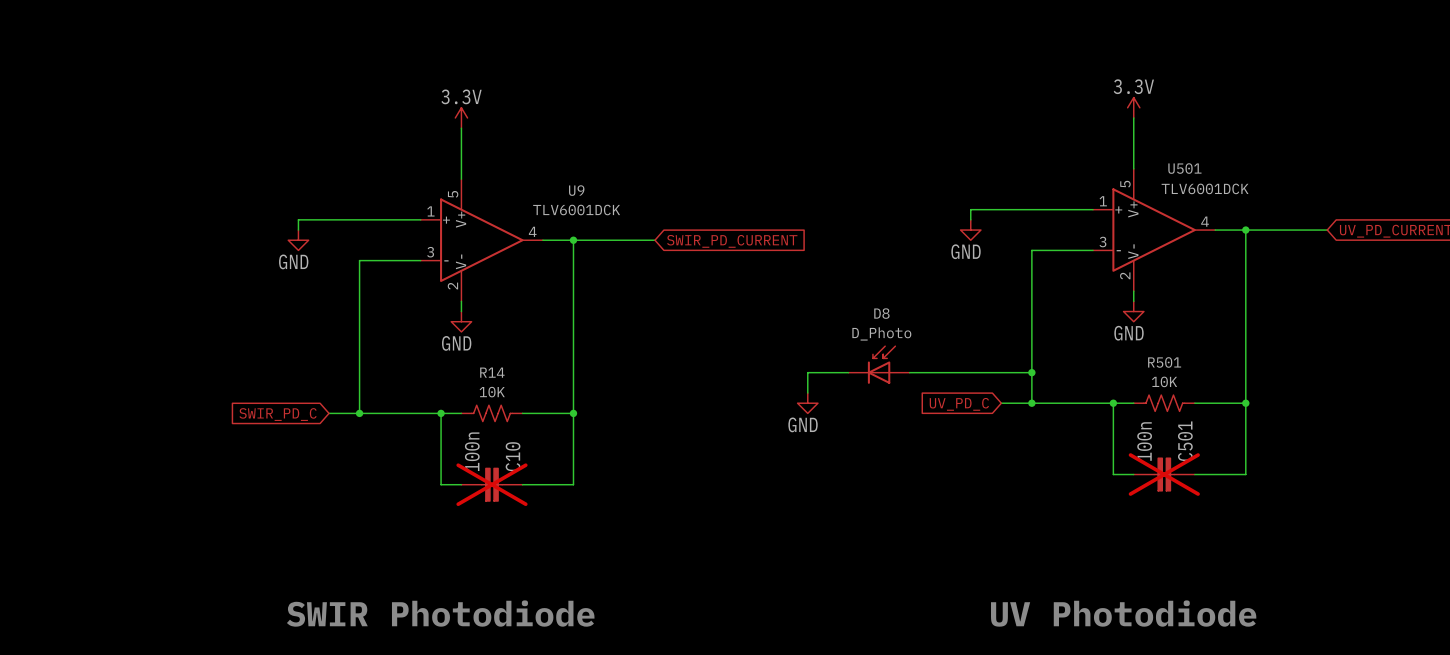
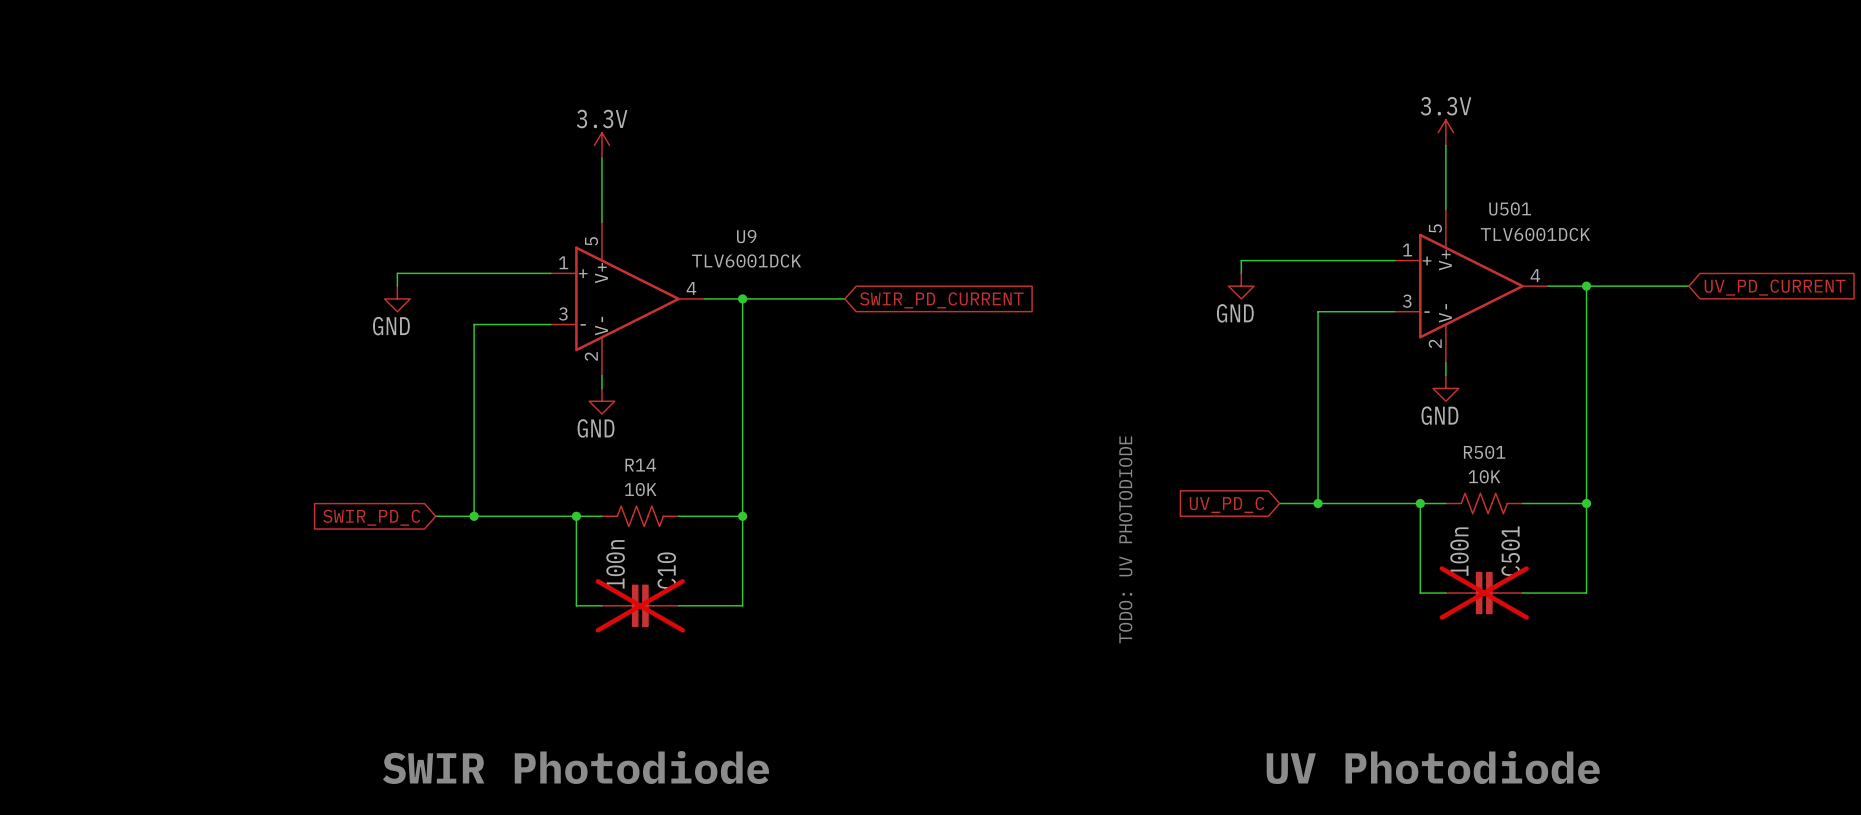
D8: D_Photo (879, 365) -> none
wire: (848, 372) (807, 372) (807, 393) -> none
wire: (909, 372) (1031, 372) -> none
junction: (1031, 372) -> none
power symbol: GND (807, 403) -> none
text: none -> TODO: UV PHOTODIODE (1125, 539)

